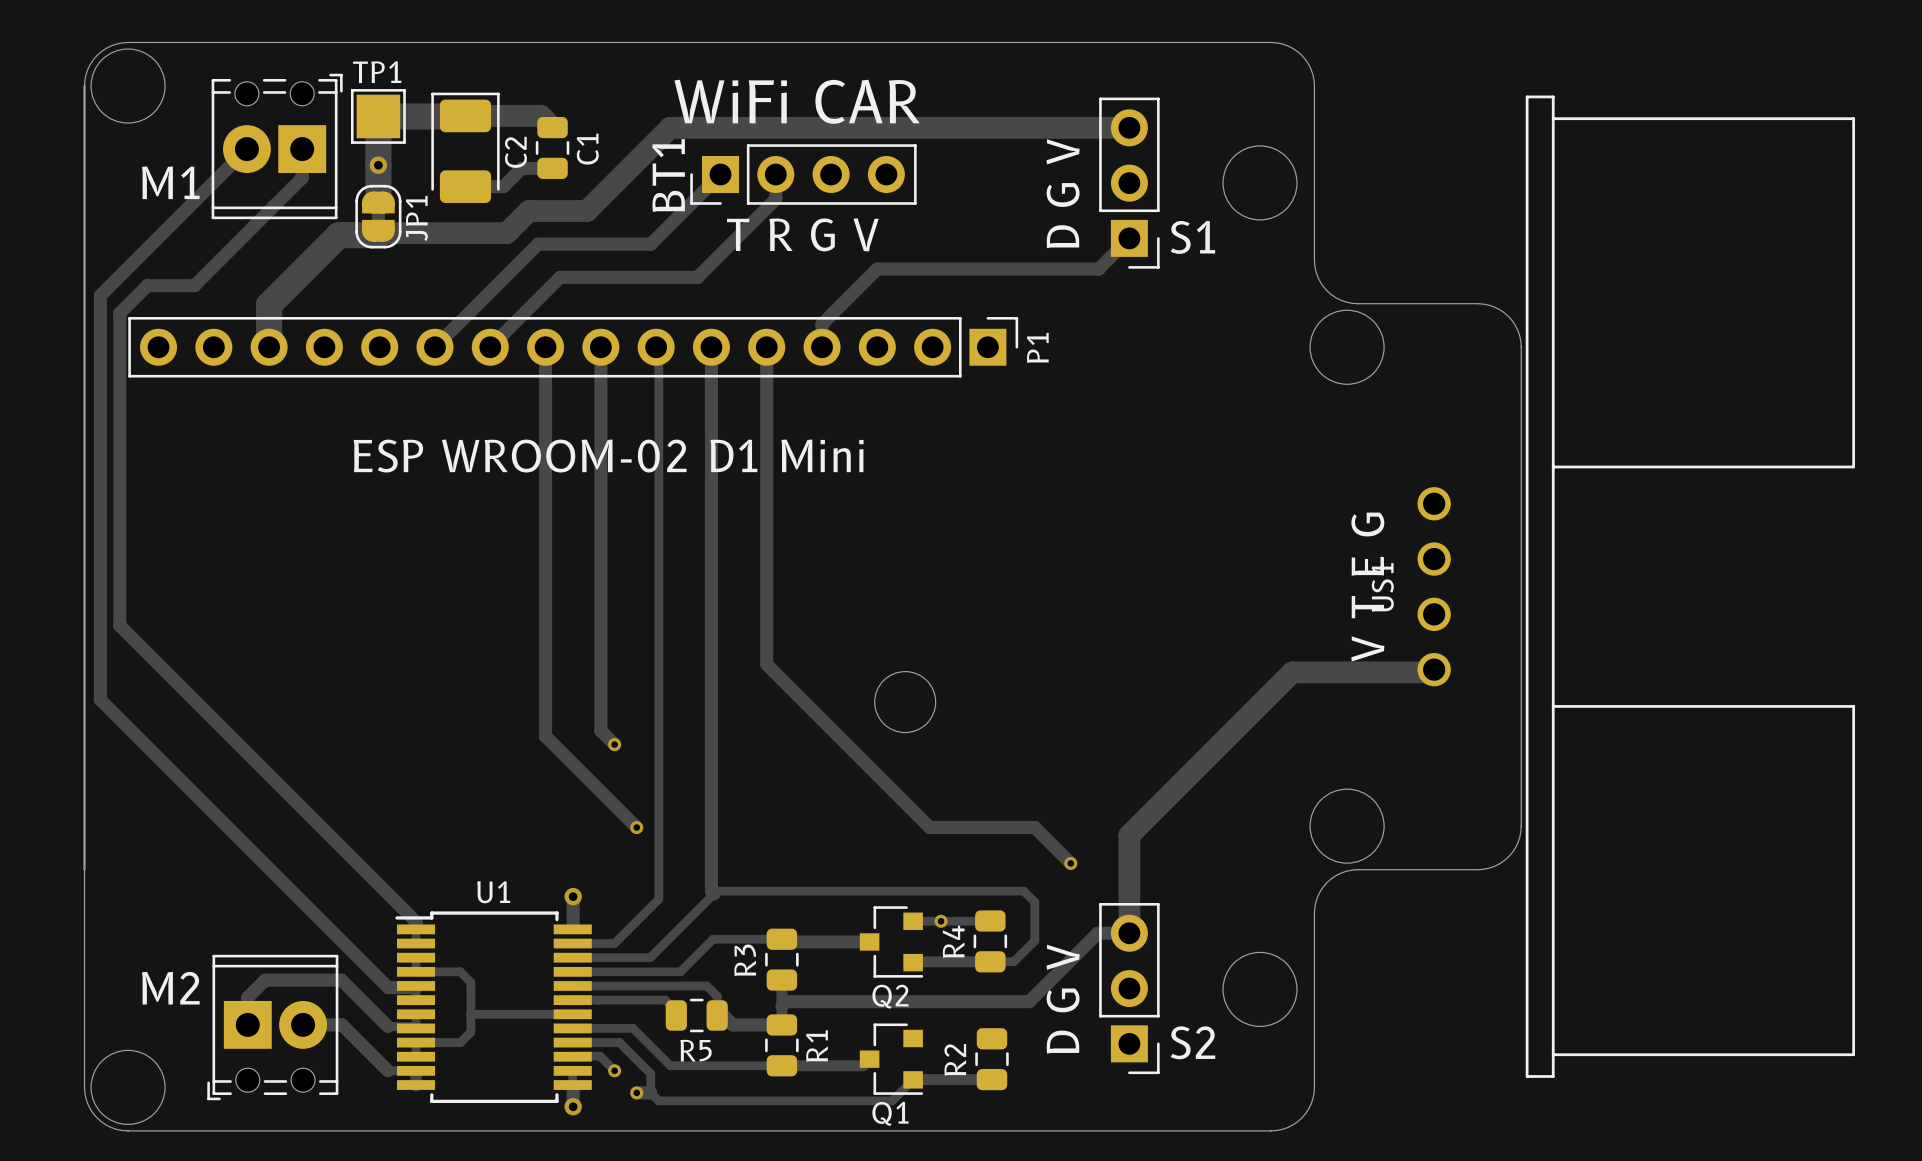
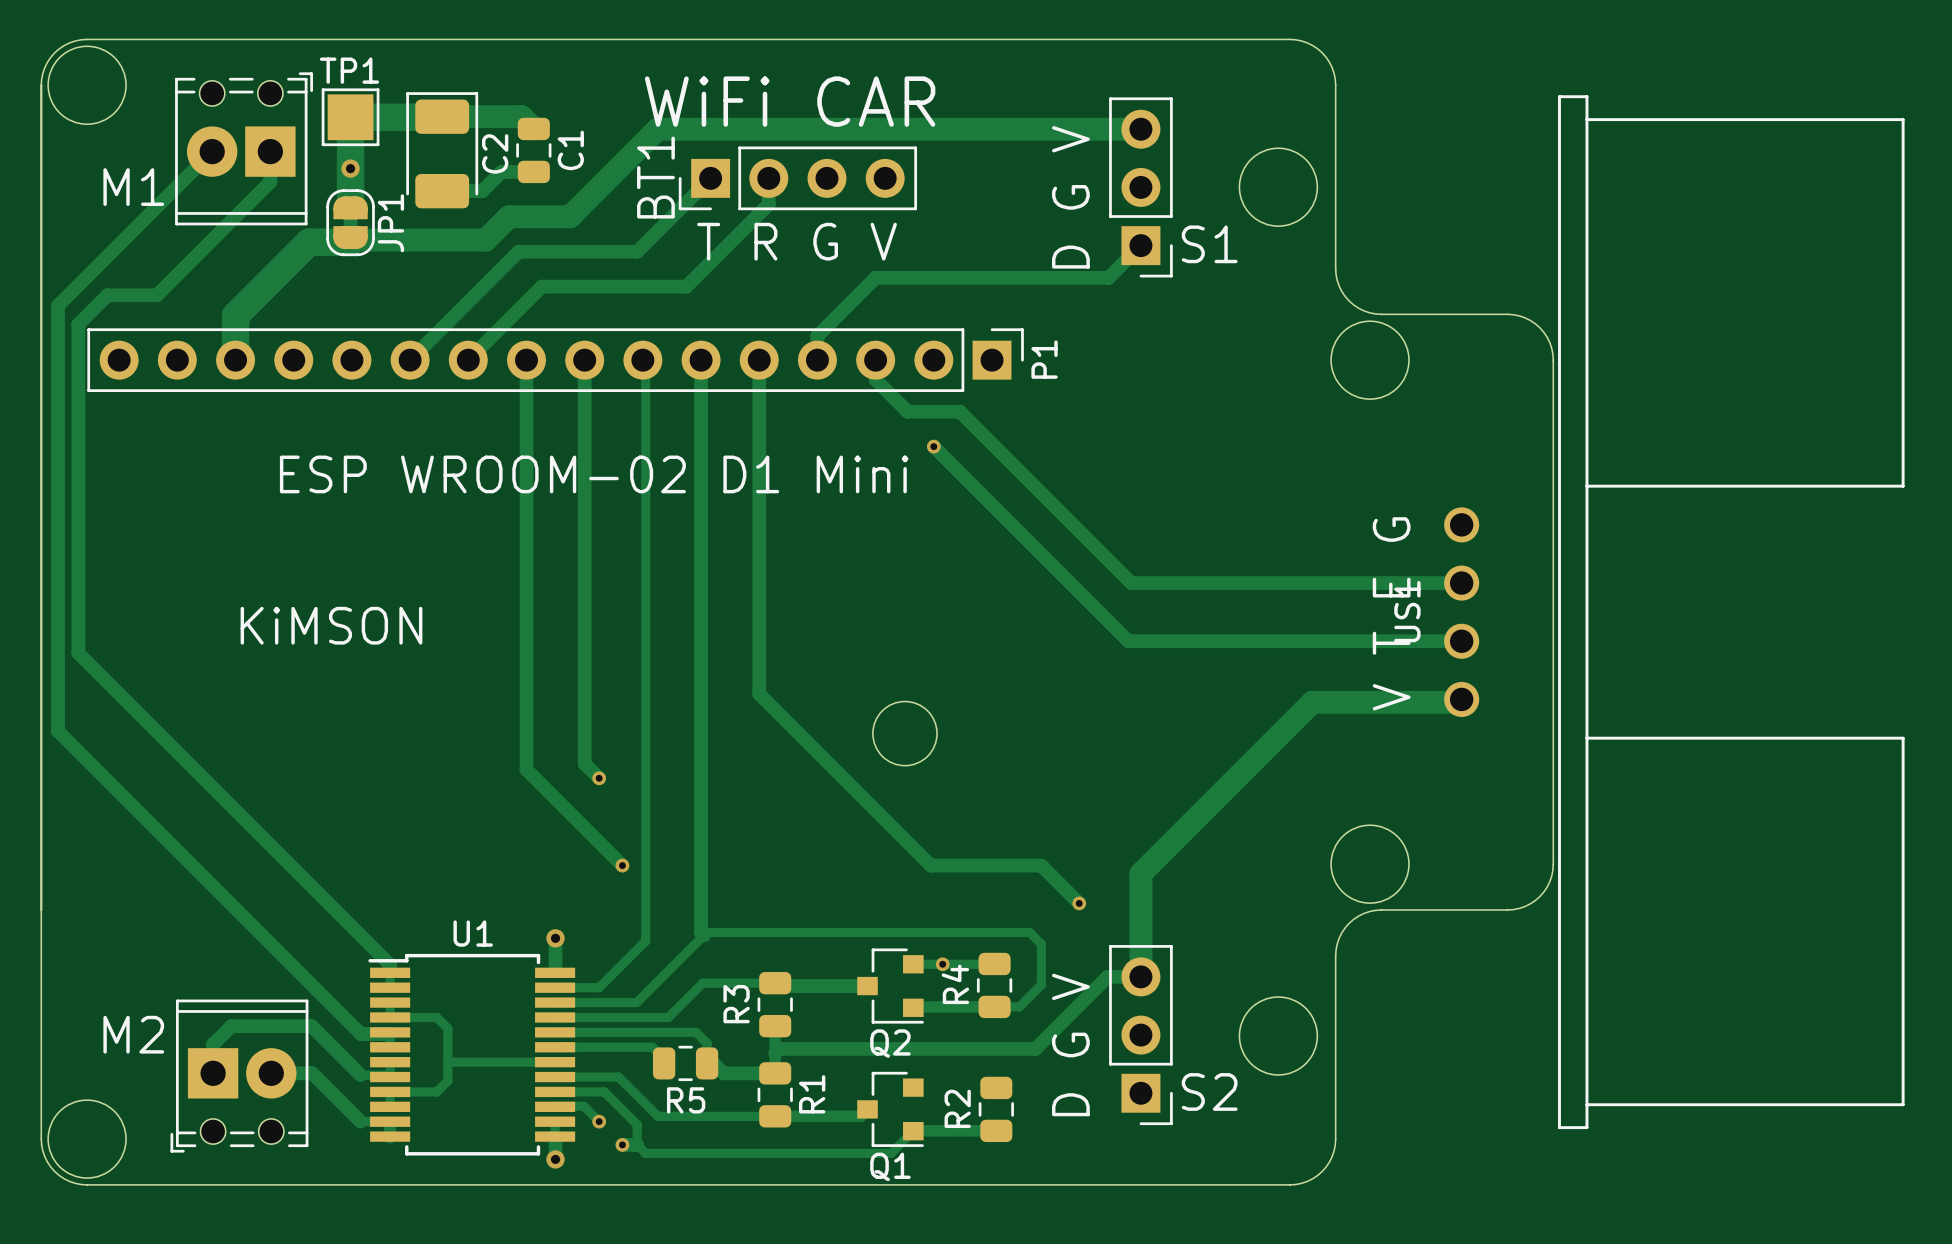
track: none -> (875, 360) (875, 379) (907, 411) (959, 411) (1131, 583) (1461, 583)
track: none -> (933, 446) (1128, 641) (1461, 641)
via: none -> (933, 446)
text: none -> KiMSON (331, 625)

